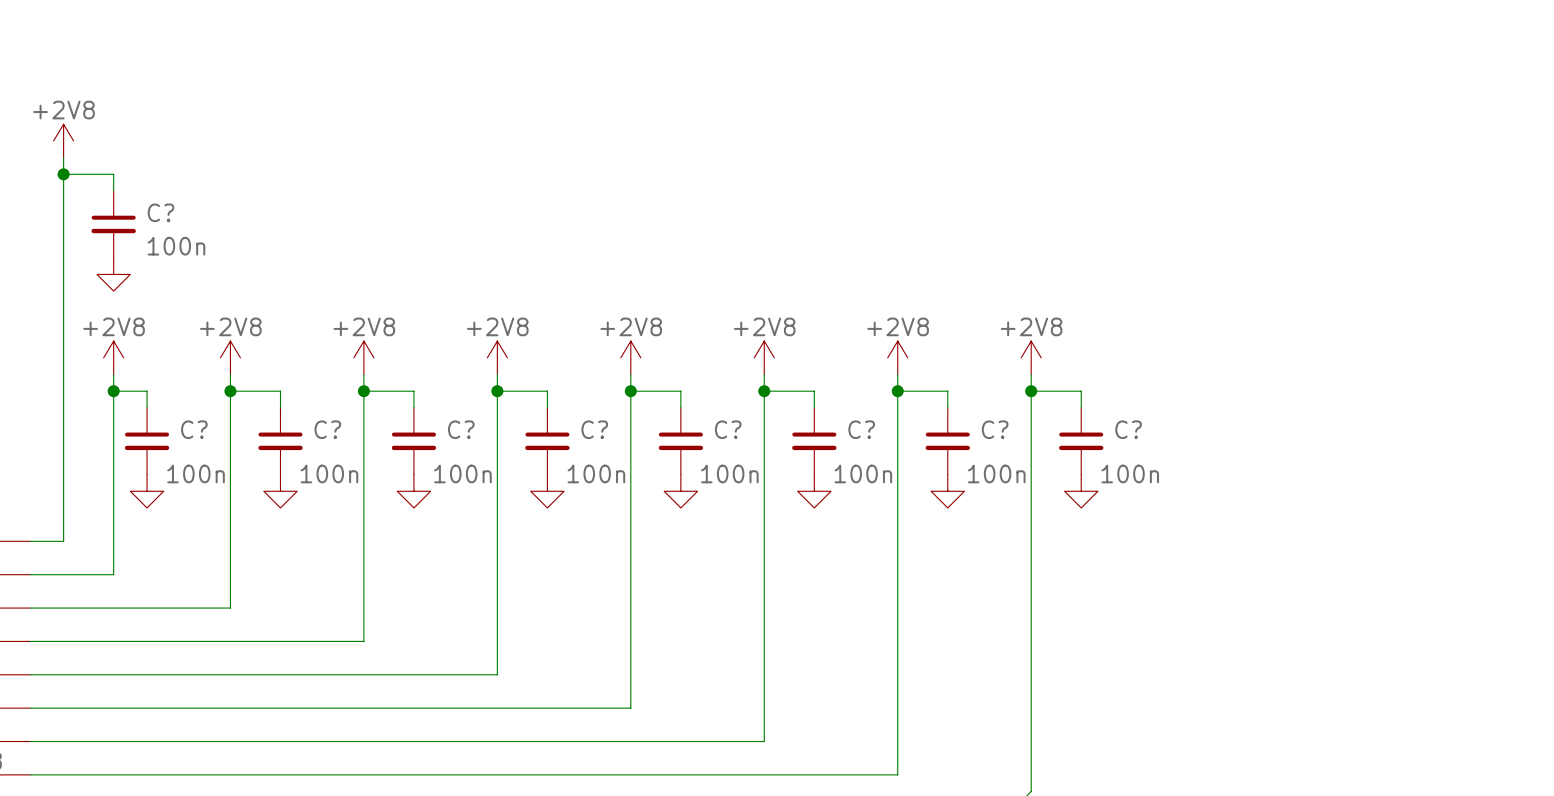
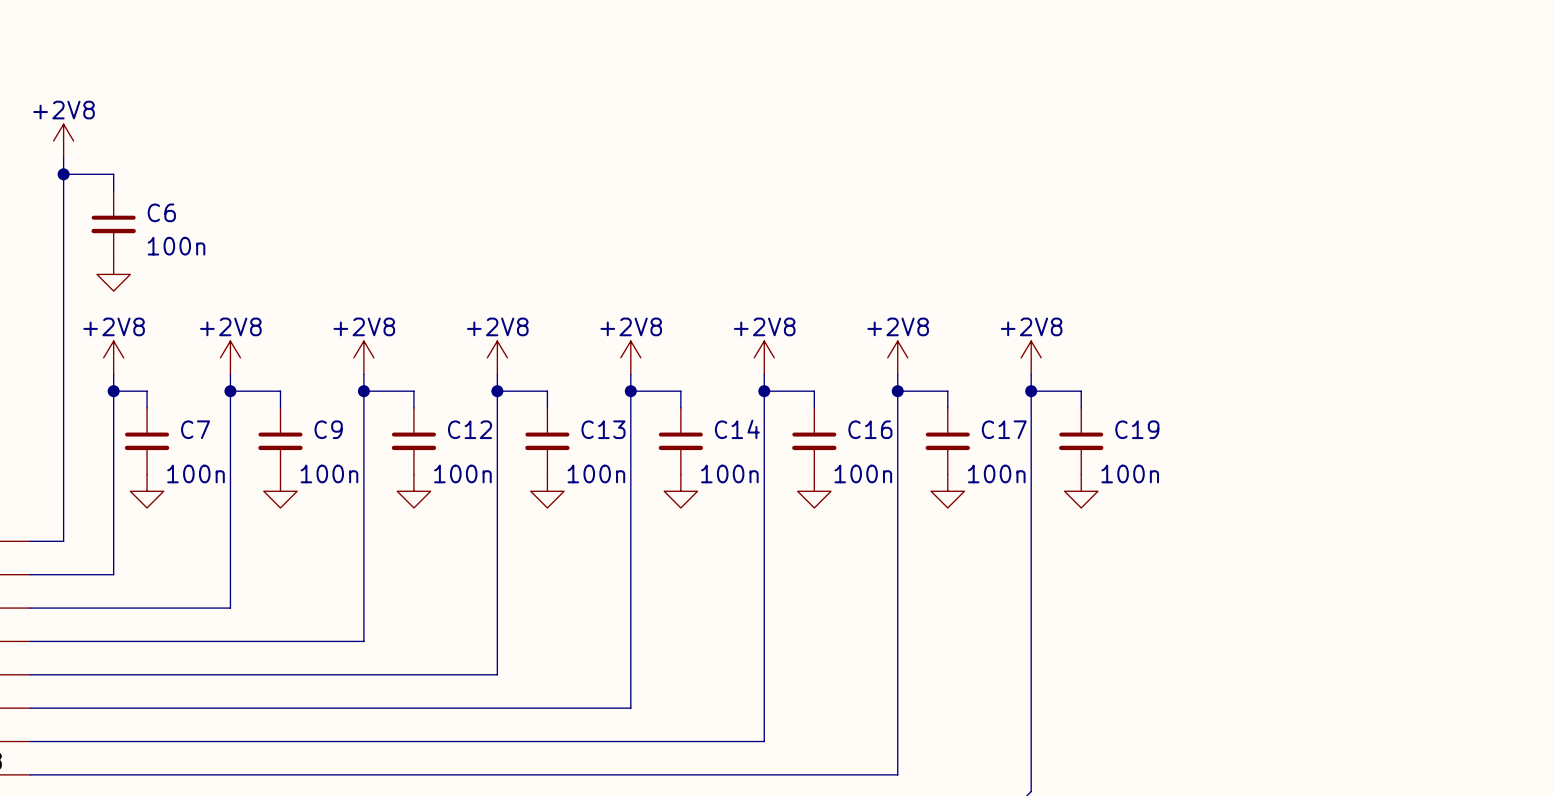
C? name: C? (161, 212) -> C6 (161, 212)
C? name: C? (194, 429) -> C7 (195, 429)
C? name: C? (327, 429) -> C9 (328, 429)
C? name: C? (461, 429) -> C12 (470, 429)
C? name: C? (594, 429) -> C13 (603, 429)
C? name: C? (728, 429) -> C14 (737, 429)
C? name: C? (861, 429) -> C16 (870, 429)
C? name: C? (995, 429) -> C17 (1004, 429)
C? name: C? (1128, 429) -> C19 (1137, 429)

